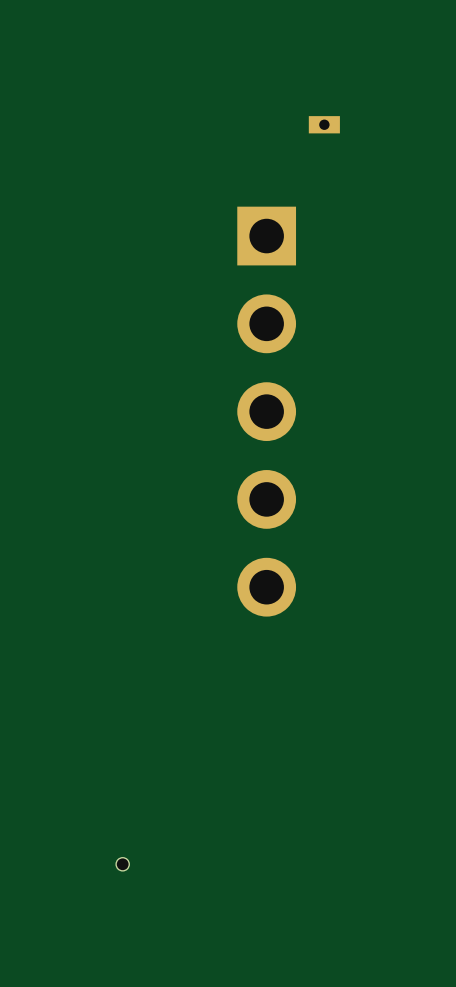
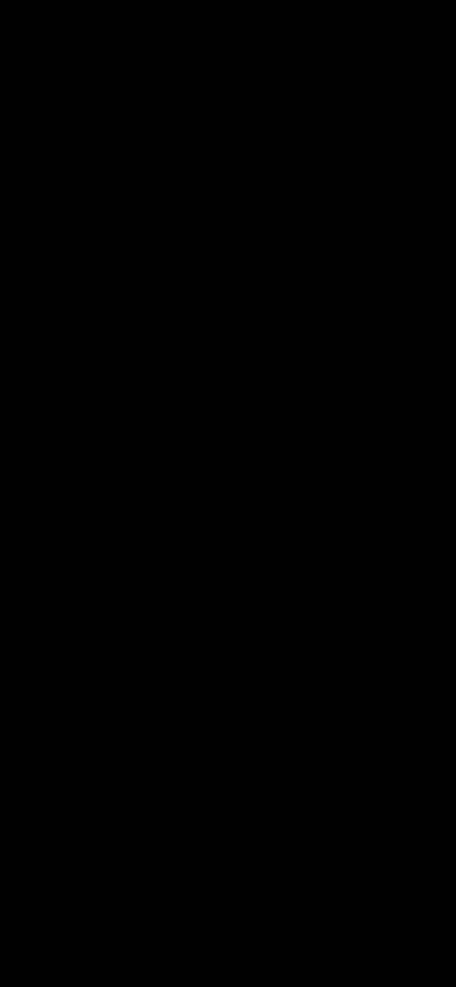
part: (324, 124) -> none
part: (266, 411) -> none
part: (122, 864) -> none

